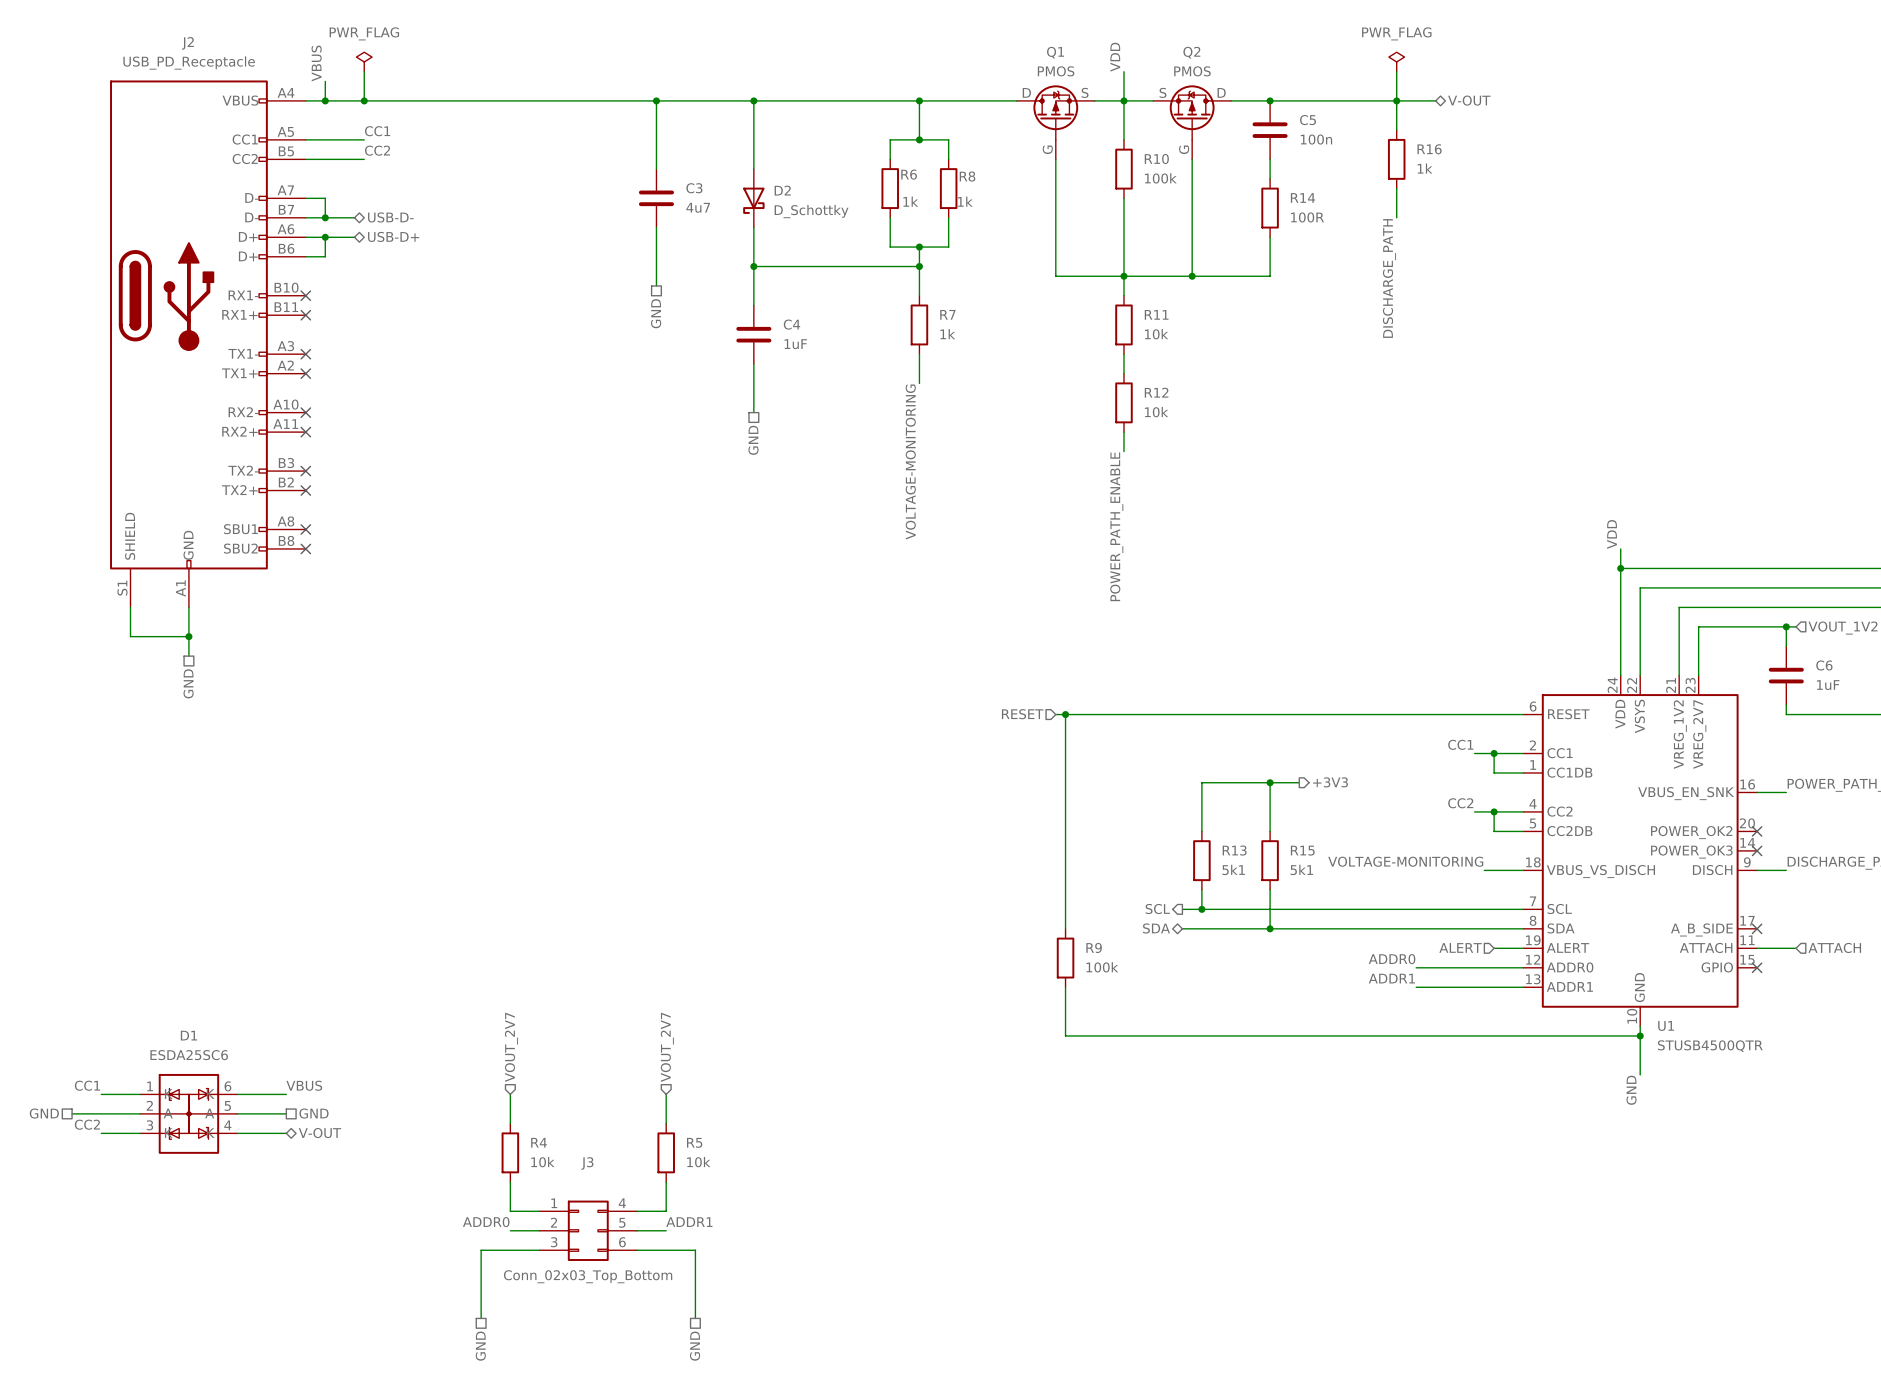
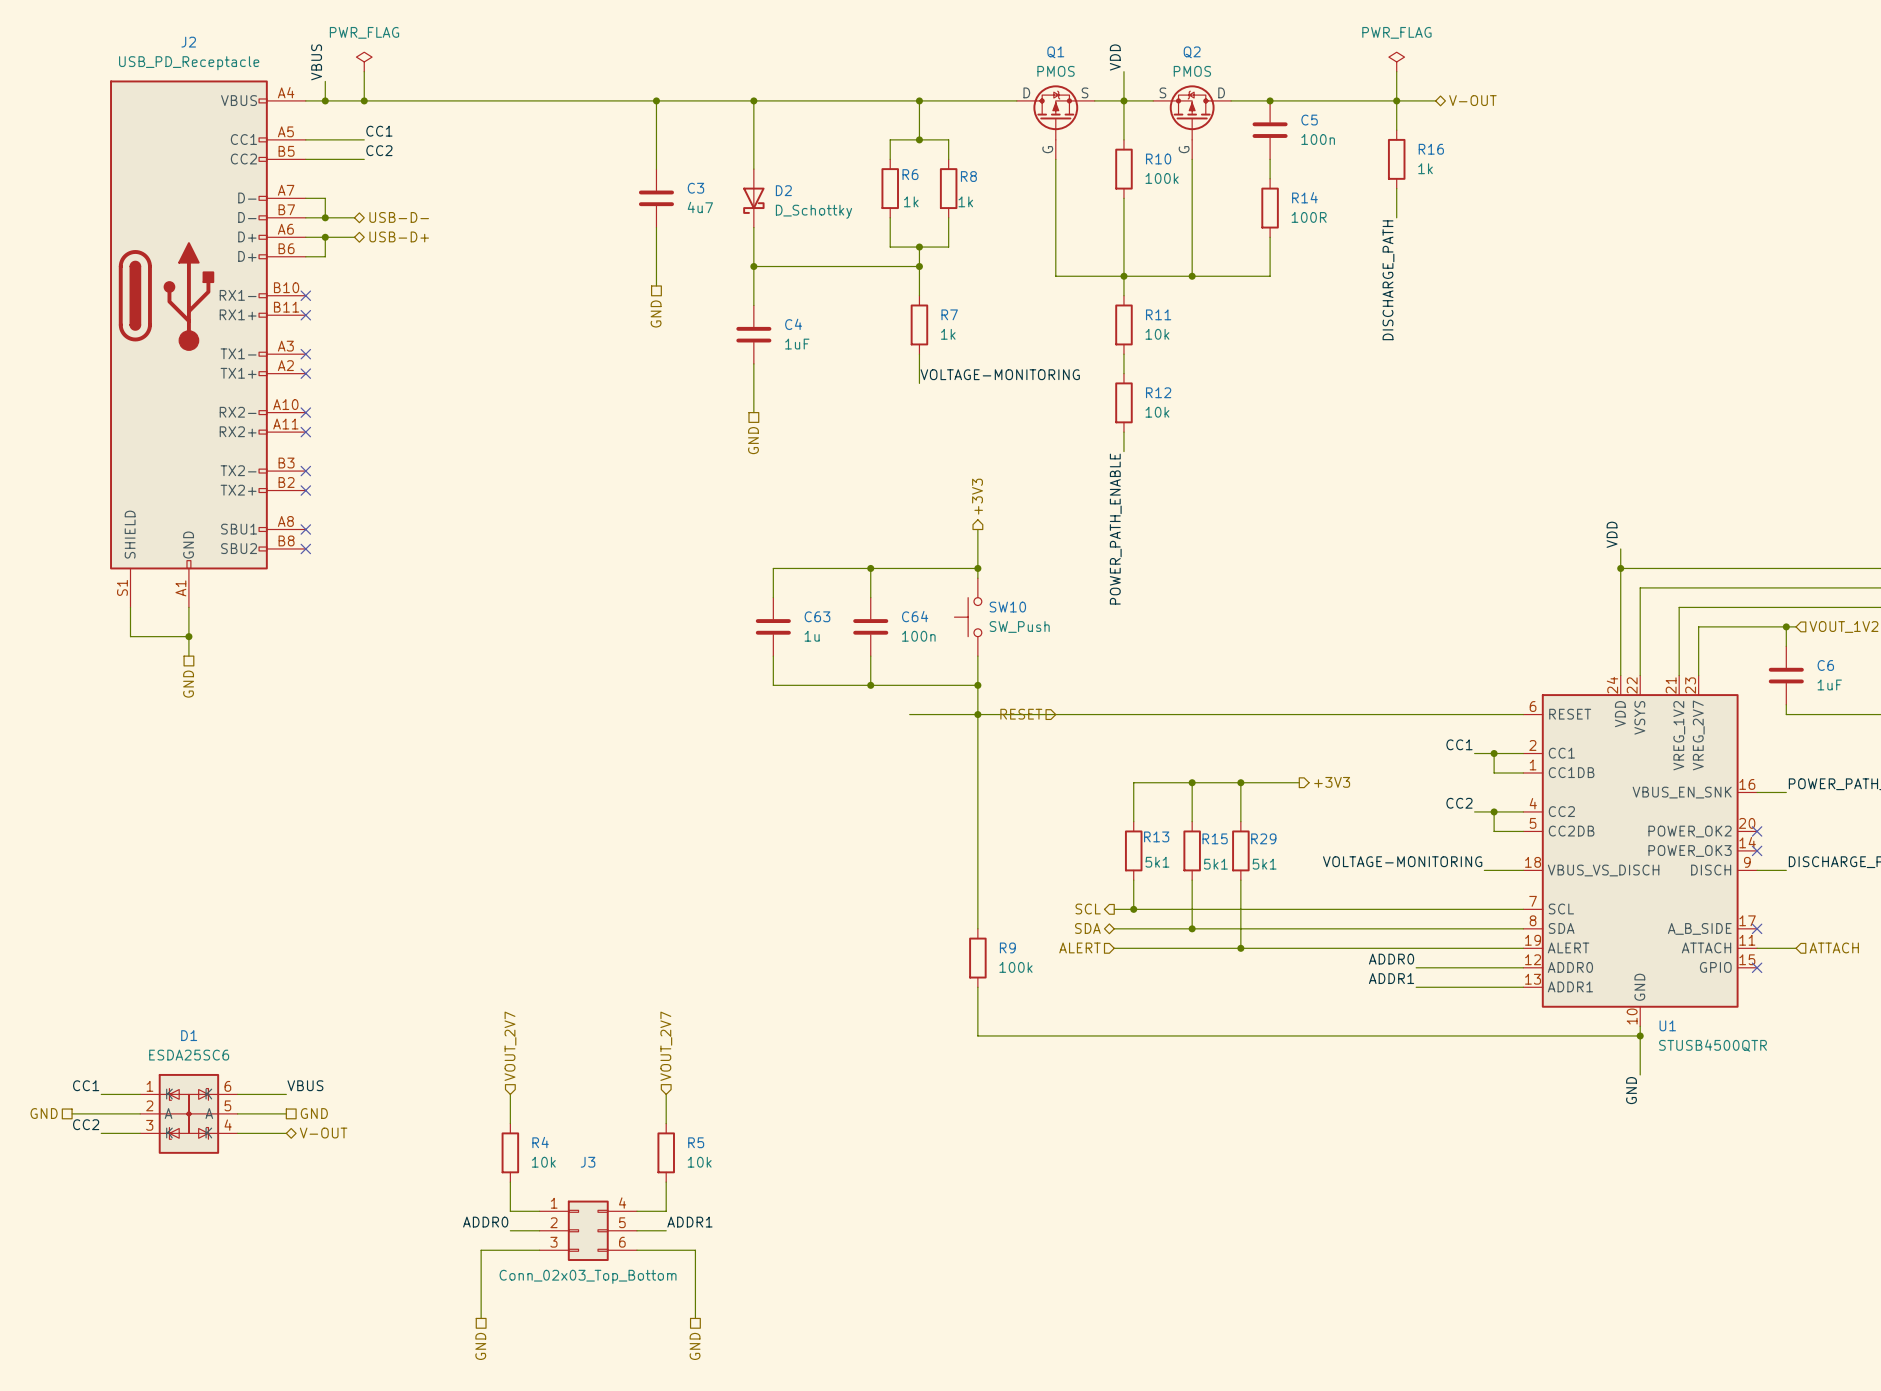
label rotation: 0° (910, 462) -> 90° clockwise (1000, 374)
hierarchical label: none -> +3V3 (977, 496)
wire: none -> (977, 529) (977, 578)
wire: none -> (870, 568) (870, 597)
junction: none -> (870, 568)
wire: none -> (977, 568) (773, 568) (773, 597)
junction: none -> (977, 568)
SW10: none -> SW_Push (968, 617)
C63: none -> 1u (773, 626)
C64: none -> 100n (870, 626)
wire: none -> (773, 656) (773, 685) (977, 685)
wire: none -> (870, 656) (870, 685)
wire: none -> (977, 656) (977, 928)
junction: none -> (870, 685)
junction: none -> (977, 685)
wire: none -> (909, 714) (1055, 714)
junction: none -> (977, 714)
wire: (1065, 714) (1065, 928) -> none
junction: (1065, 714) -> none
wire: none -> (1192, 782) (1192, 821)
junction: none -> (1192, 782)
wire: (1201, 782) (1201, 831) -> (1201, 782) (1133, 782) (1133, 821)
wire: (1270, 782) (1270, 831) -> (1192, 880) (1192, 928)
junction position: (1270, 782) -> (1240, 782)
R13 name position: R13 (1234, 850) -> R13 (1156, 836)
R29: none -> 5k1 (1240, 850)
R15 name position: R15 (1302, 850) -> R15 (1215, 838)
R13 position: (1201, 860) -> (1133, 850)
R15 position: (1270, 860) -> (1192, 850)
R13 value position: 5k1 (1233, 869) -> 5k1 (1157, 862)
R15 value position: 5k1 (1301, 869) -> 5k1 (1215, 864)
wire: none -> (1133, 880) (1133, 909)
wire: none -> (1240, 880) (1240, 948)
wire: (1201, 889) (1201, 909) -> none
wire: (1270, 889) (1270, 928) -> (1240, 782) (1240, 821)
wire: none -> (1114, 909) (1182, 909)
junction: none -> (1133, 909)
hierarchical label position: SCL (1157, 909) -> SCL (1088, 908)
junction position: (1201, 909) -> (1192, 928)
wire: none -> (1114, 928) (1182, 928)
hierarchical label position: SDA (1156, 928) -> SDA (1087, 928)
junction: (1270, 928) -> none
hierarchical label: none -> ALERT (1080, 947)
hierarchical label: ALERT (1460, 947) -> none
wire: none -> (1114, 948) (1494, 948)
junction: none -> (1240, 948)
R9 position: (1065, 958) -> (977, 958)
wire: (1065, 987) (1065, 1035) -> (977, 987) (977, 1035) (1065, 1035)

